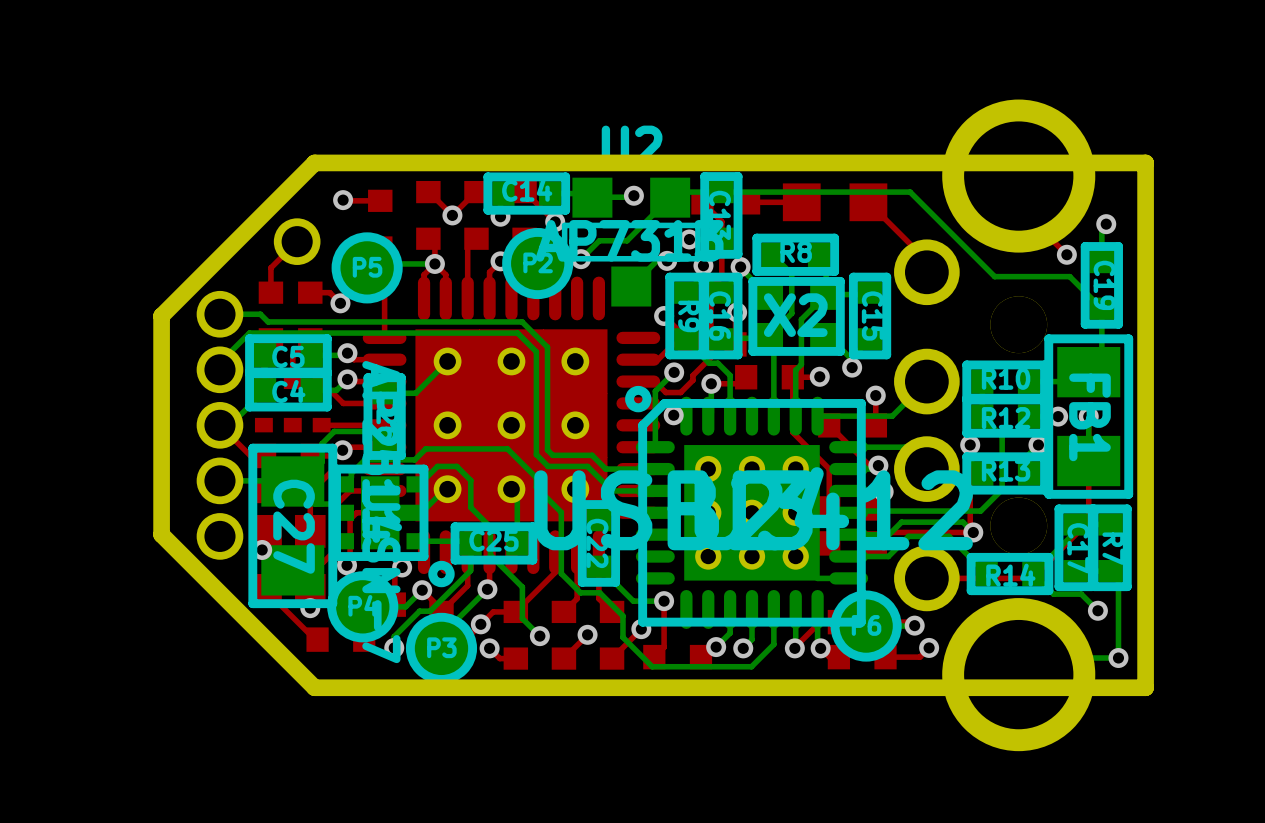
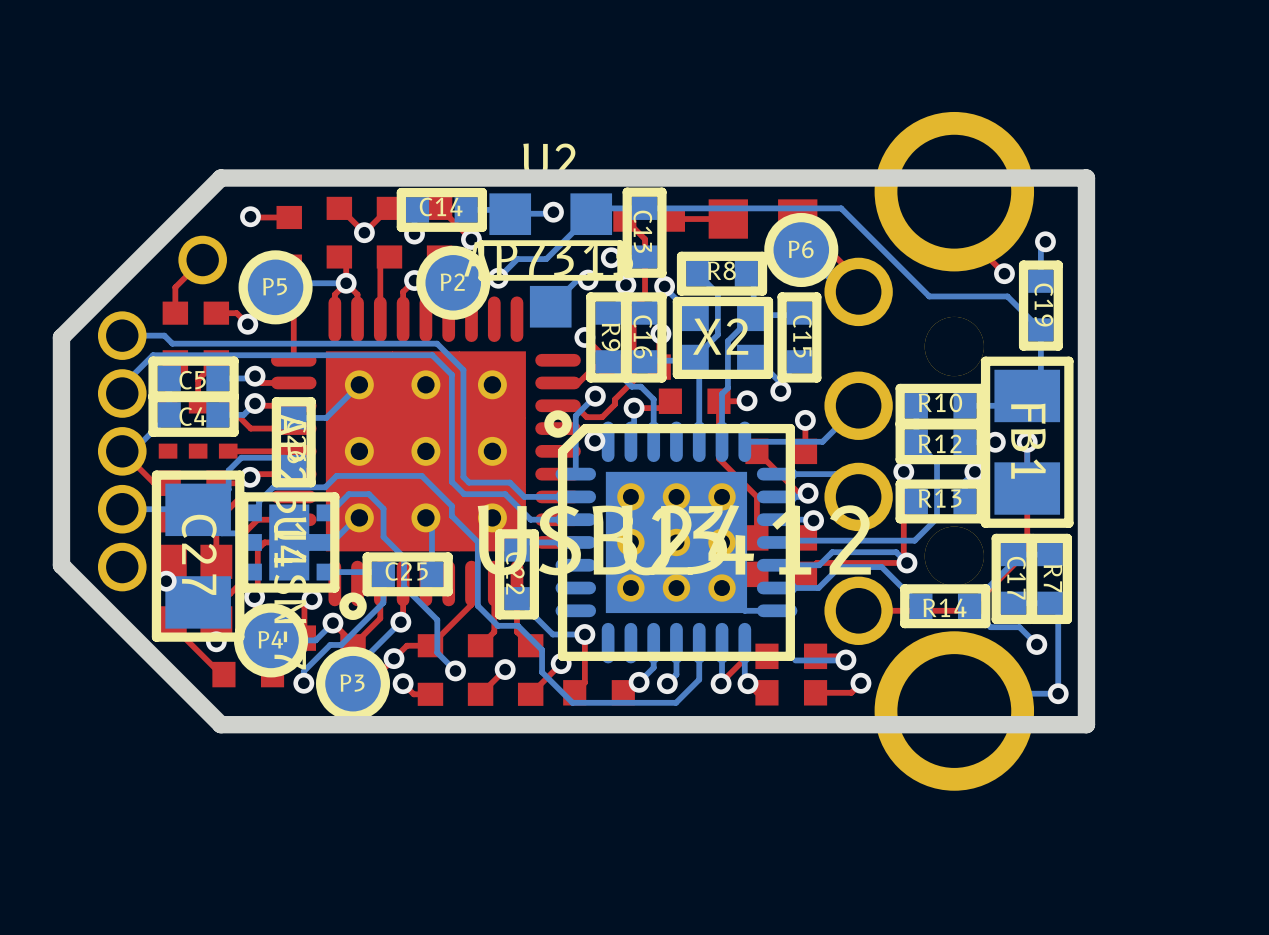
P6 position: (866, 626) -> (801, 250)

